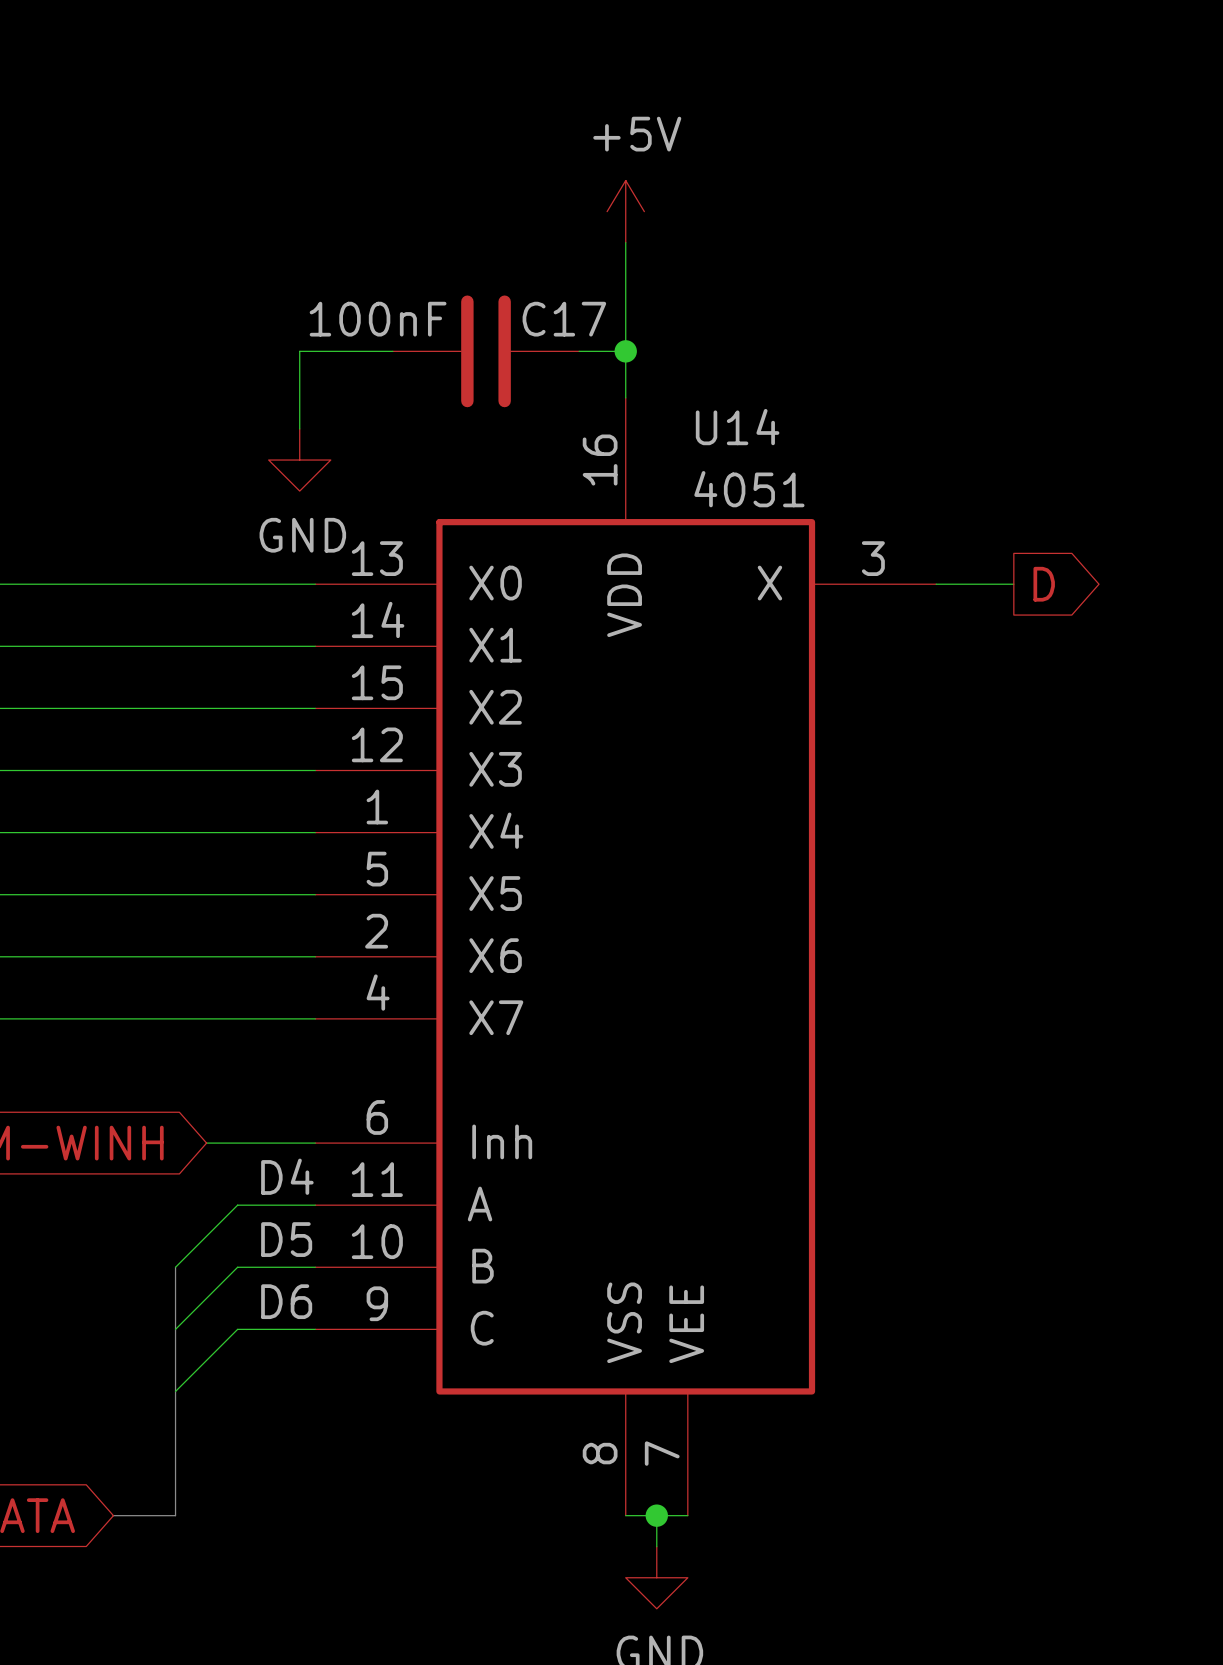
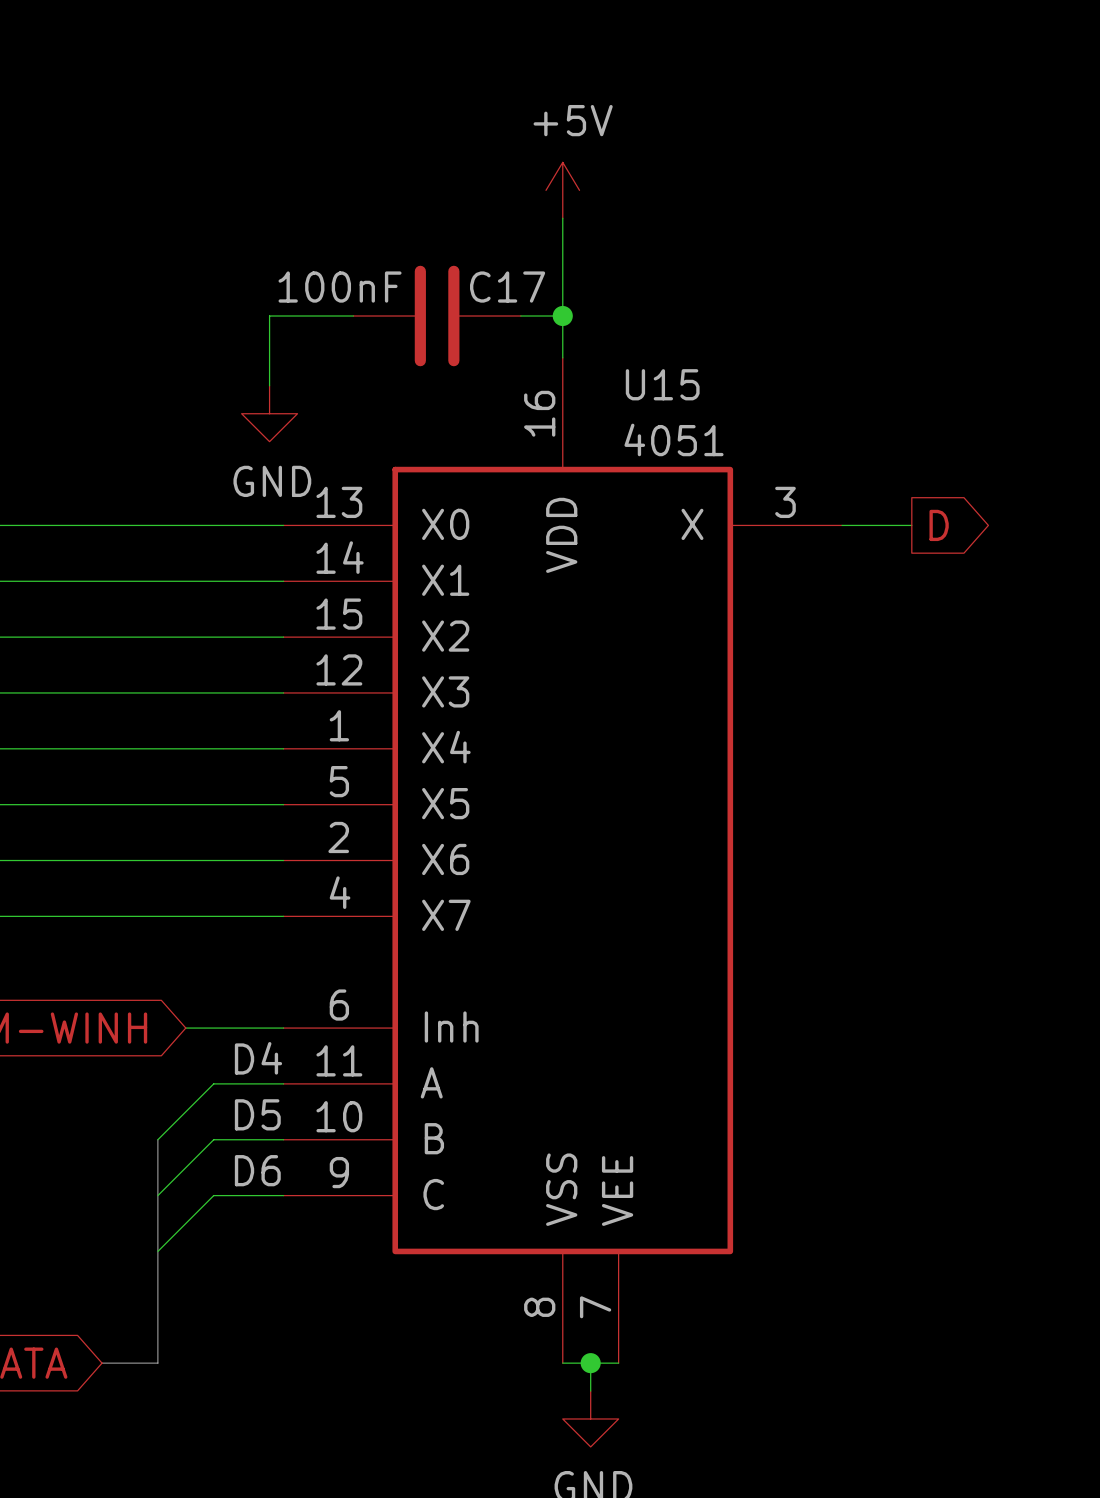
U14 name: U14 (737, 427) -> U15 (662, 384)

